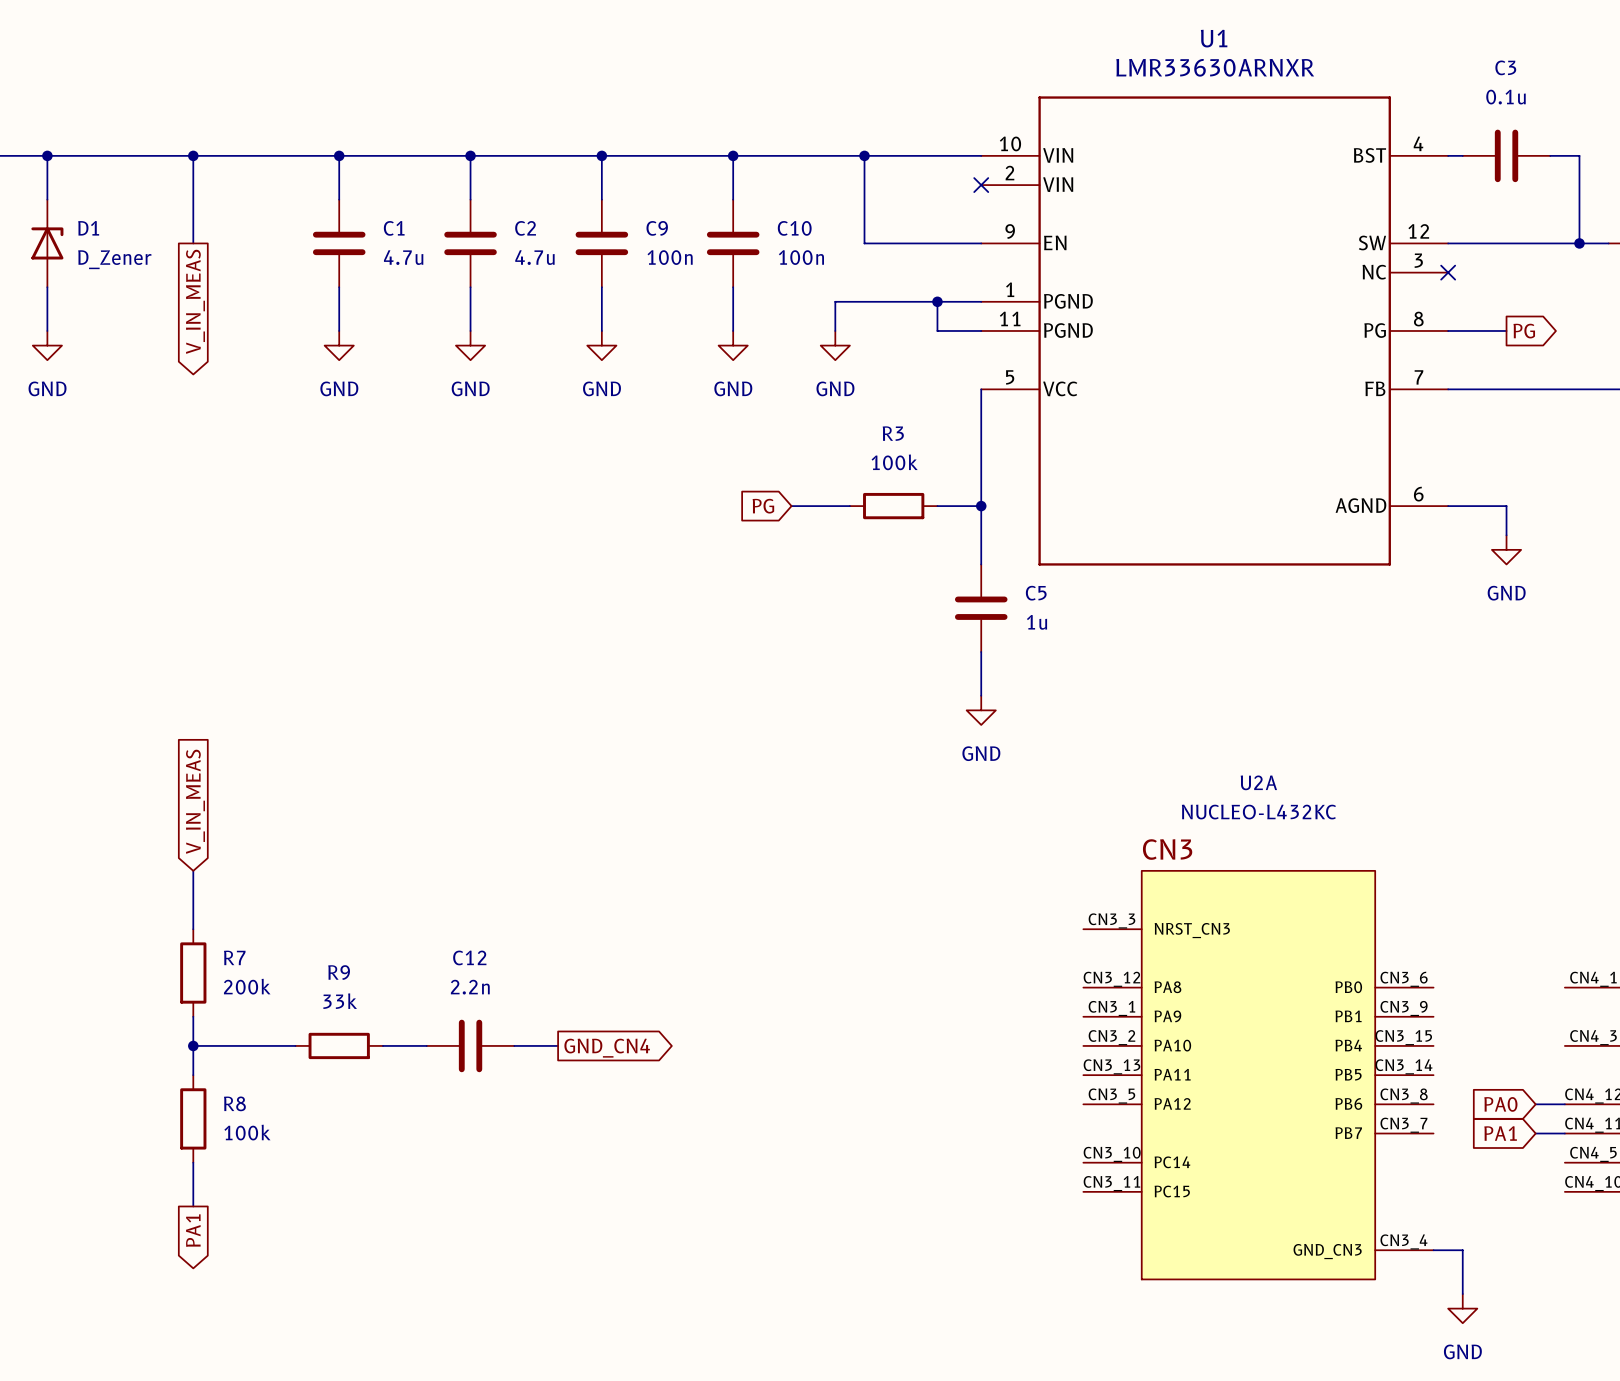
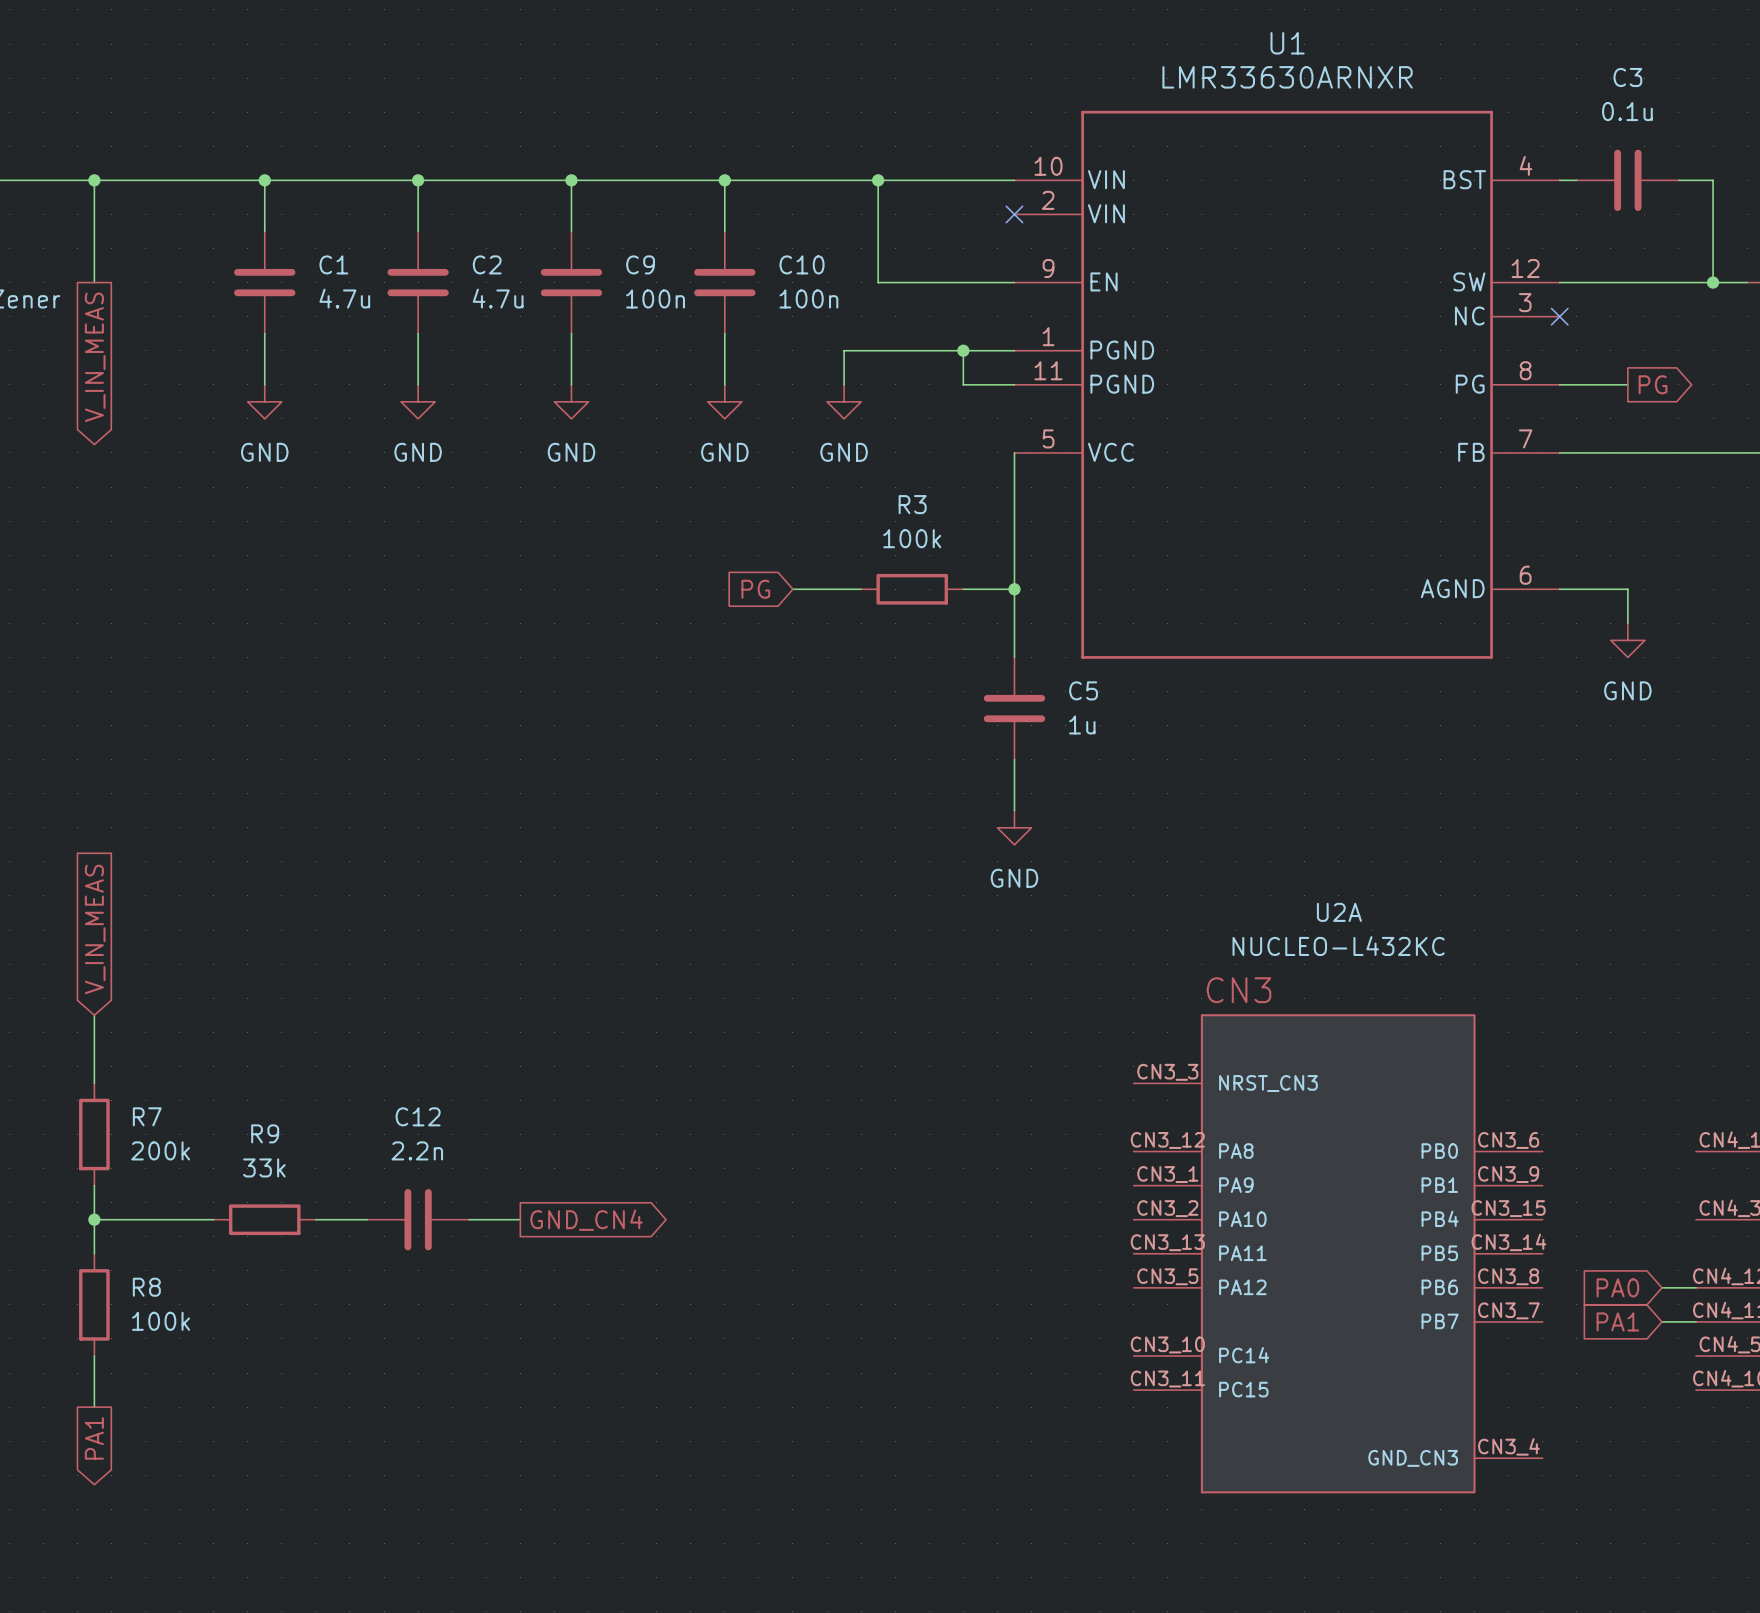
wire: (1433, 1250) (1462, 1250) (1462, 1294) -> none
power symbol: GND (1462, 1308) -> none

